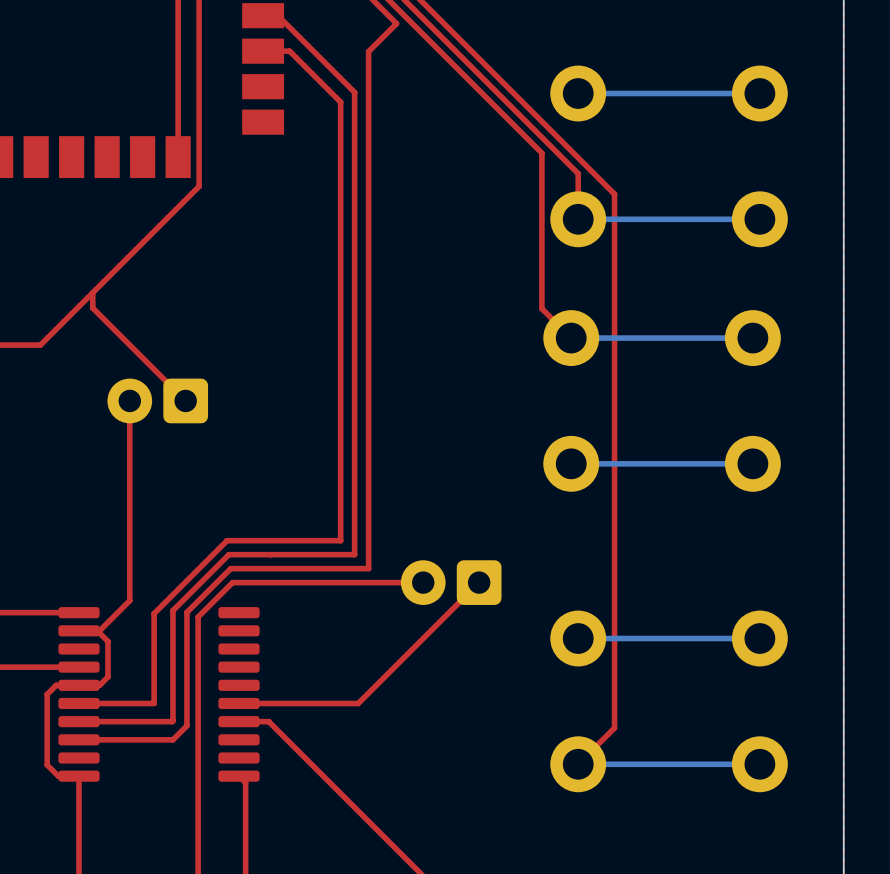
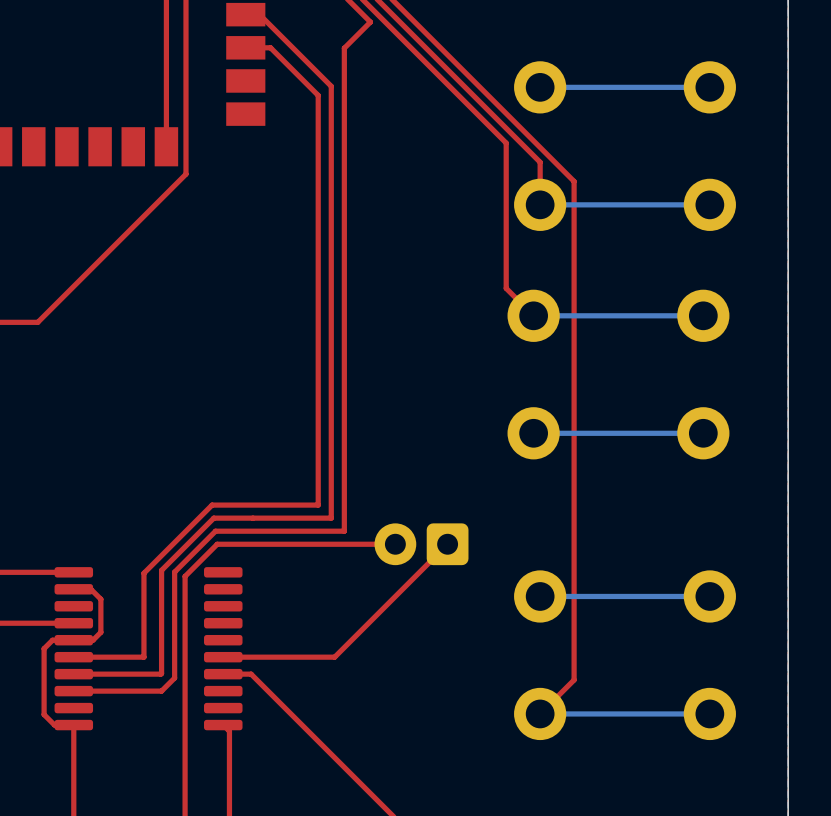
top track: (92, 292) (92, 308) (185, 400) -> none
top track: (129, 400) (129, 600) (99, 630) (97, 630) -> none
part: (157, 400) -> none

